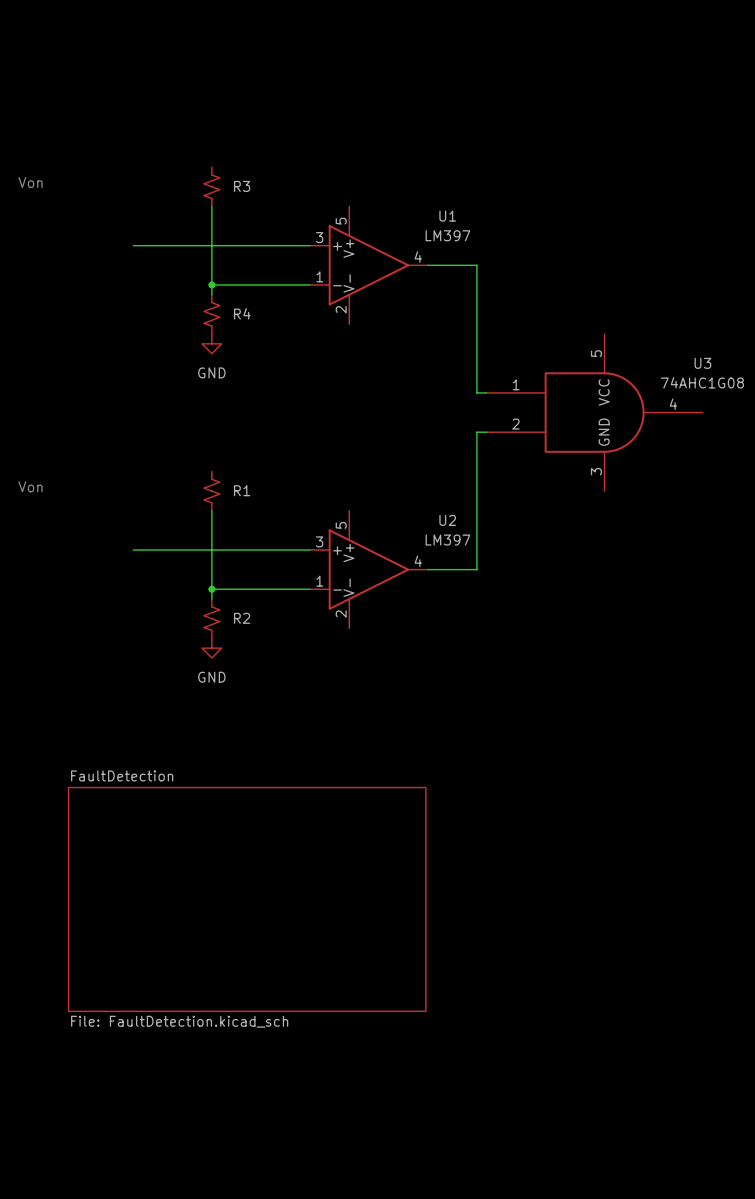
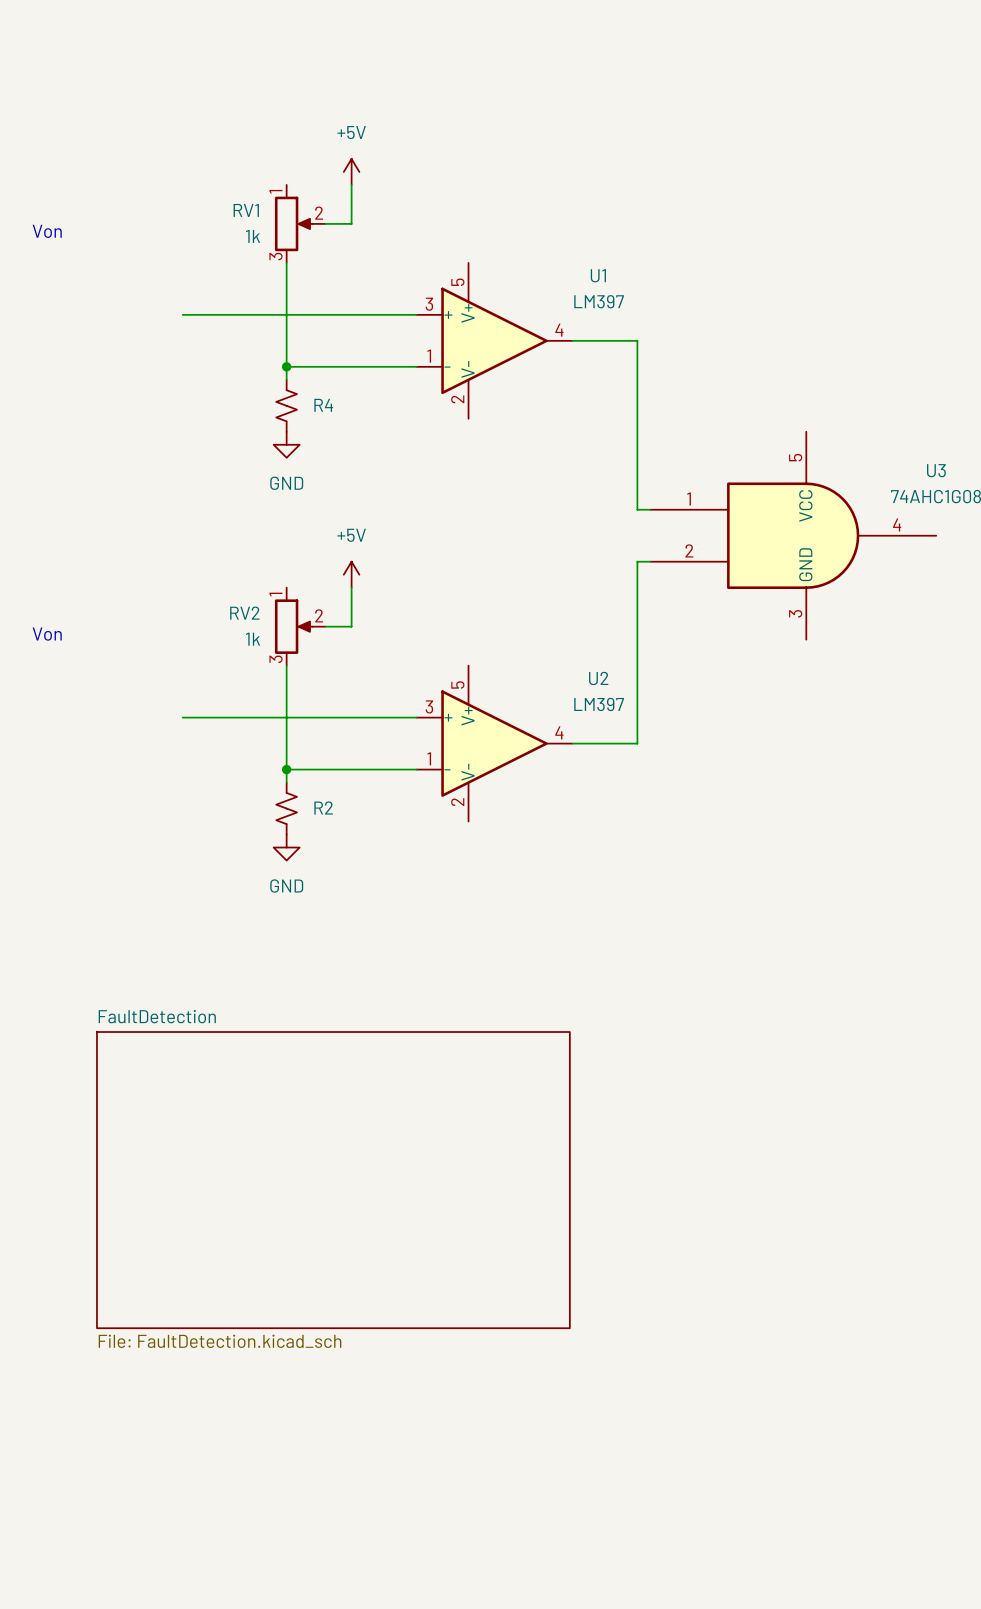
power symbol: none -> +5V (351, 171)
wire: none -> (351, 184) (351, 223) (325, 223)
RV1: none -> 1k (300, 223)
R3: (211, 186) -> none
power symbol: none -> +5V (351, 574)
wire: none -> (351, 587) (351, 626) (325, 626)
RV2: none -> 1k (300, 626)
R1: (211, 491) -> none

